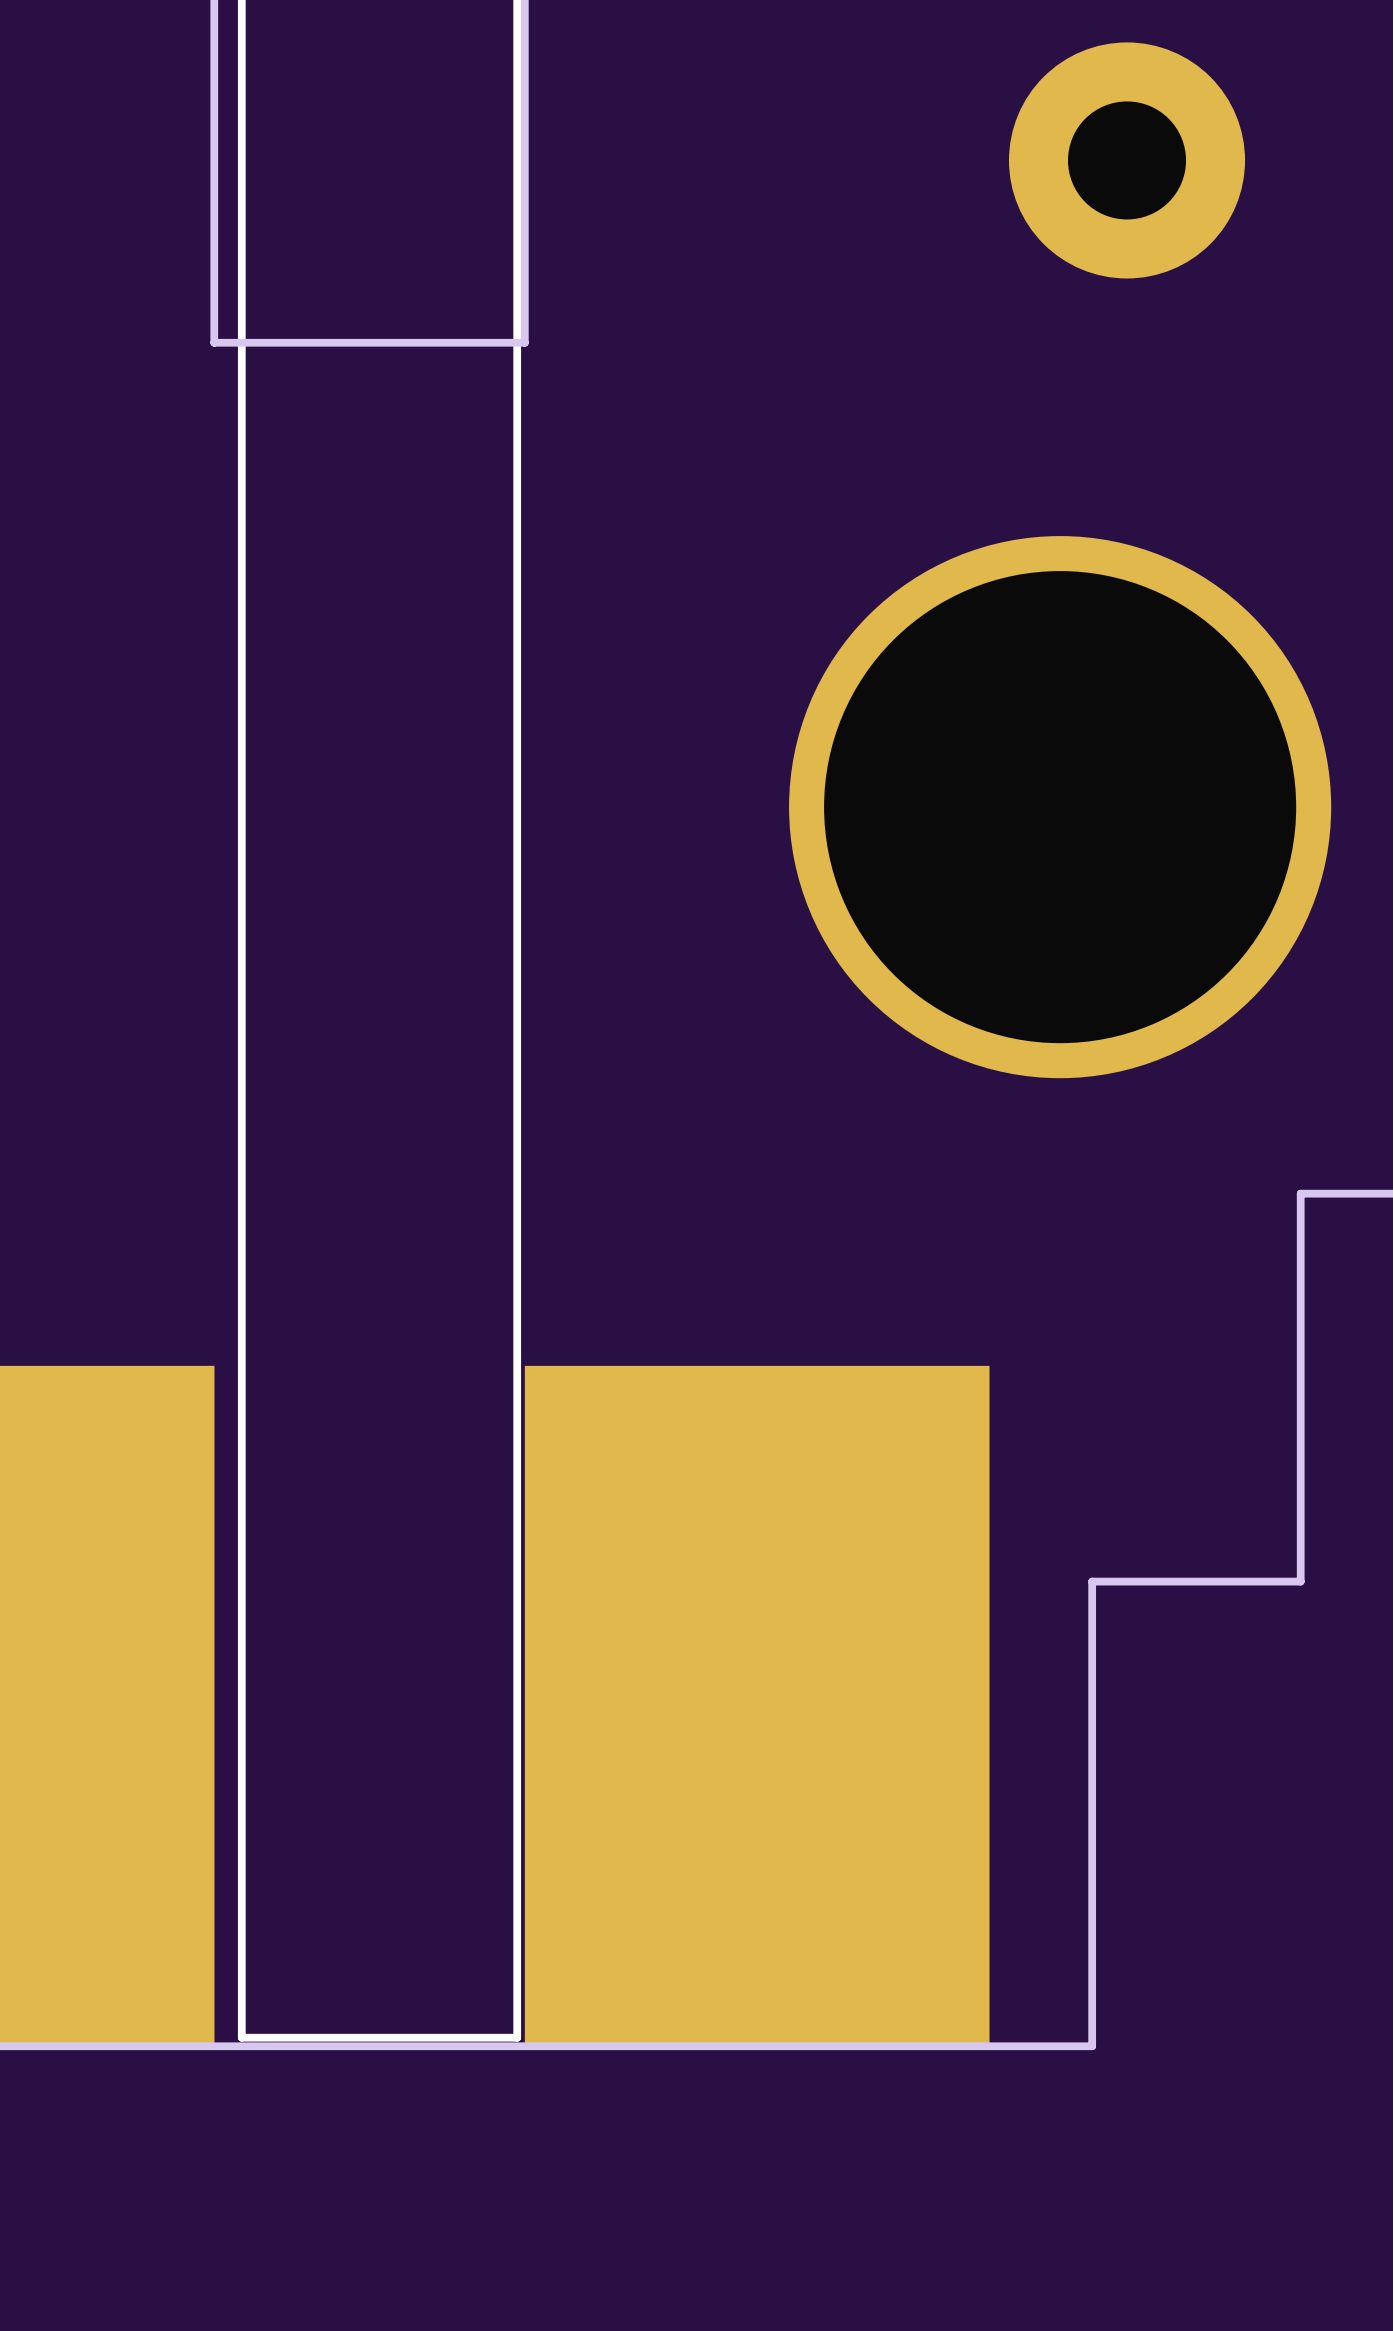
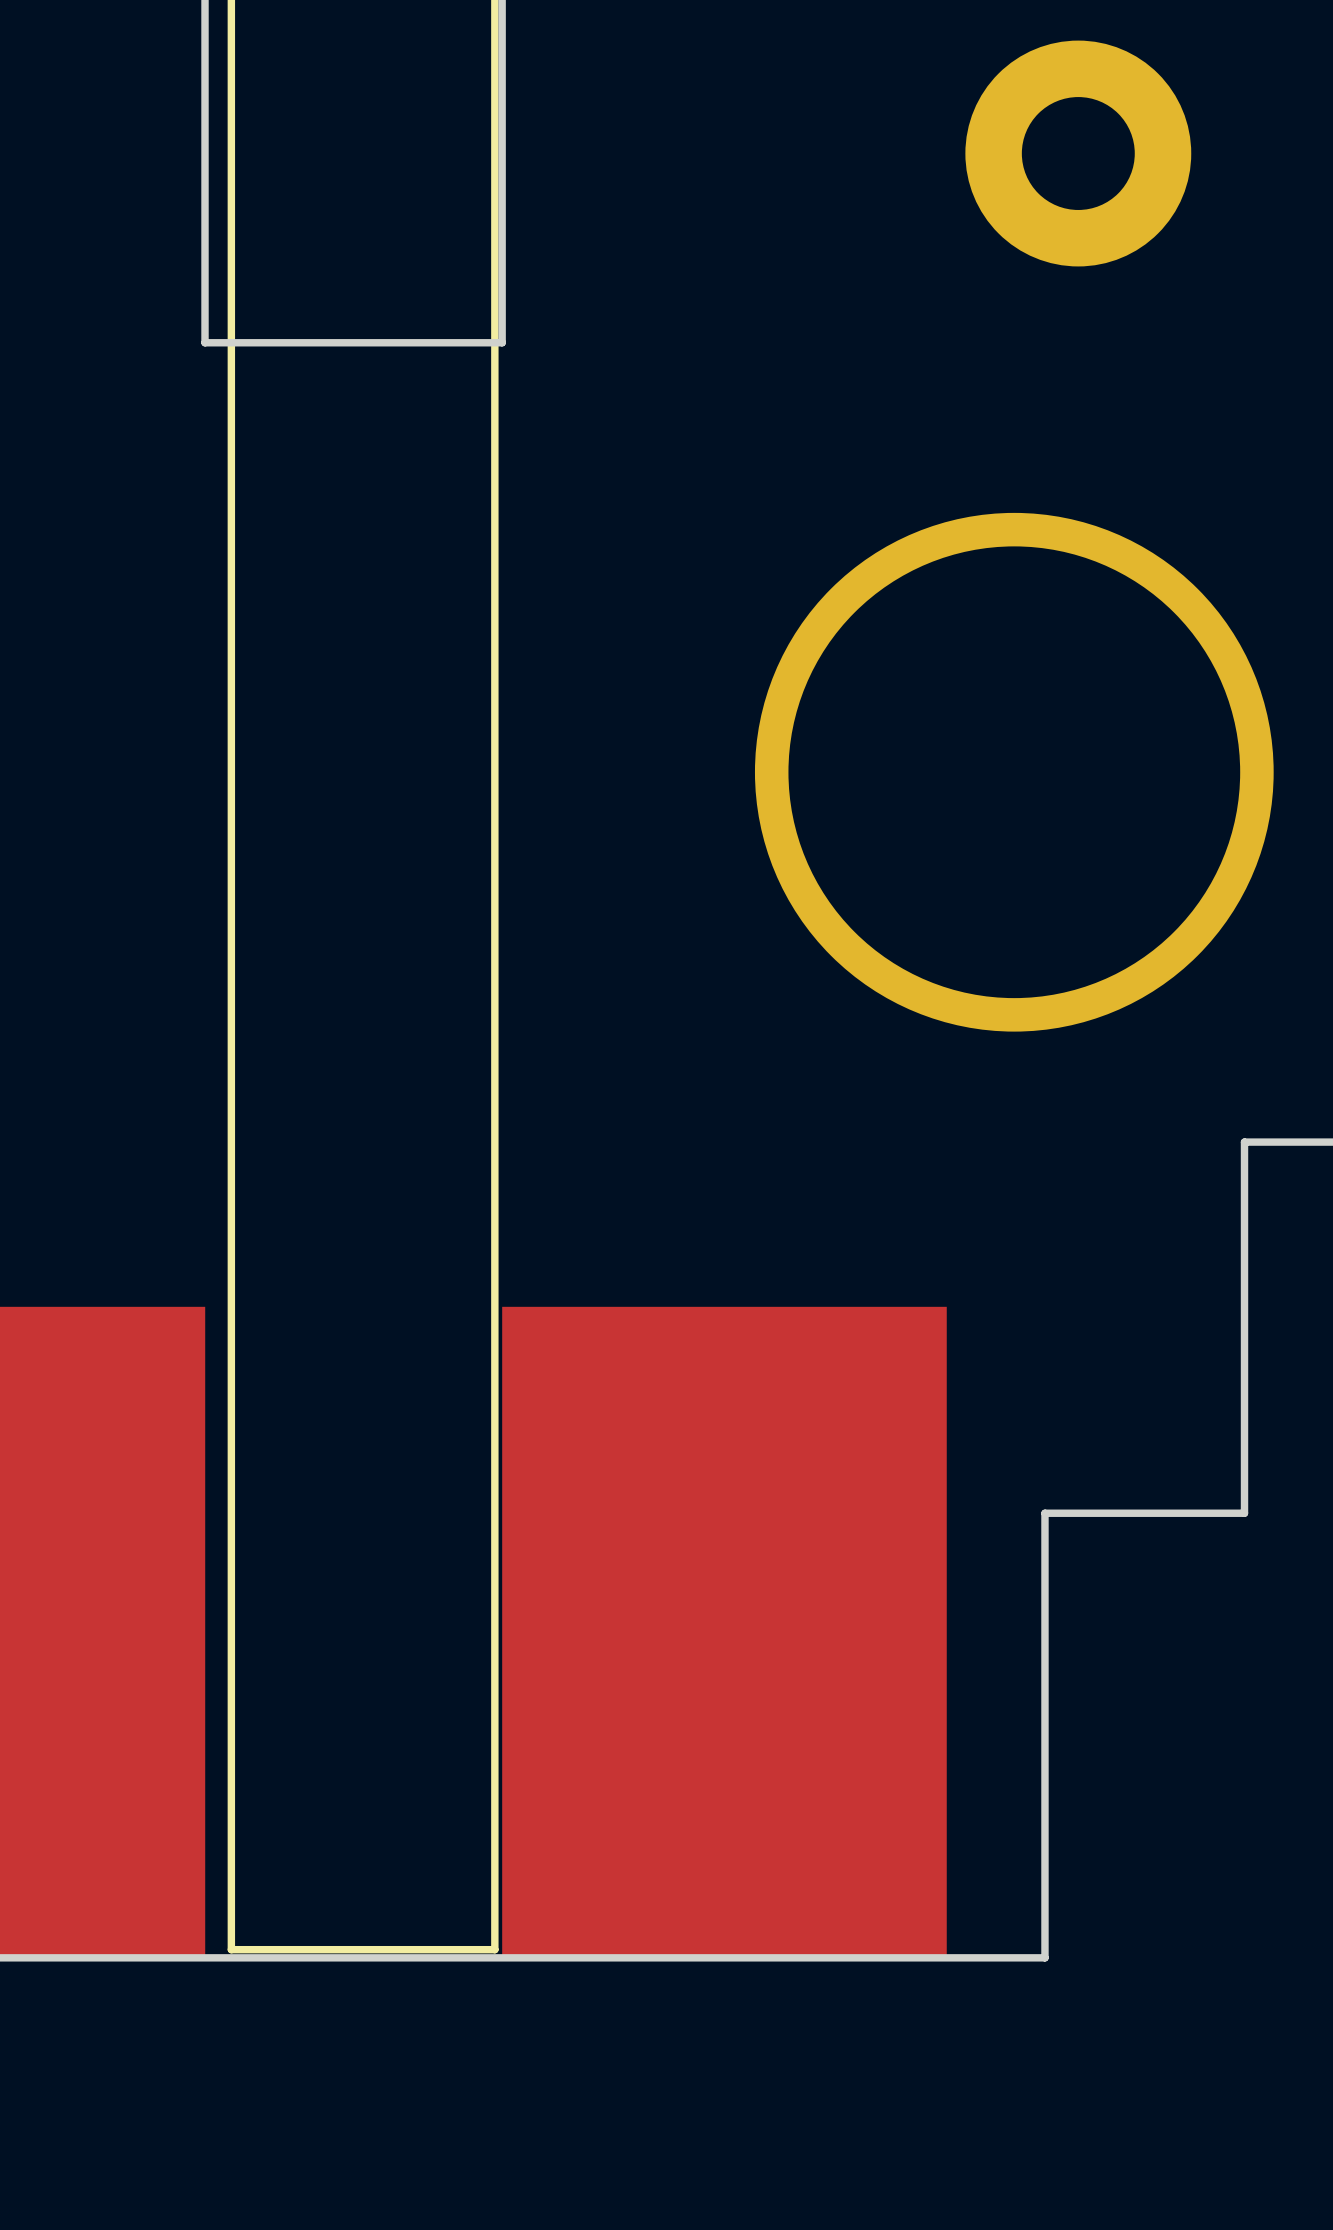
board edge: (214, 342) (524, 342) -> (205, 327) (205, 342) (502, 342) (502, 327)

